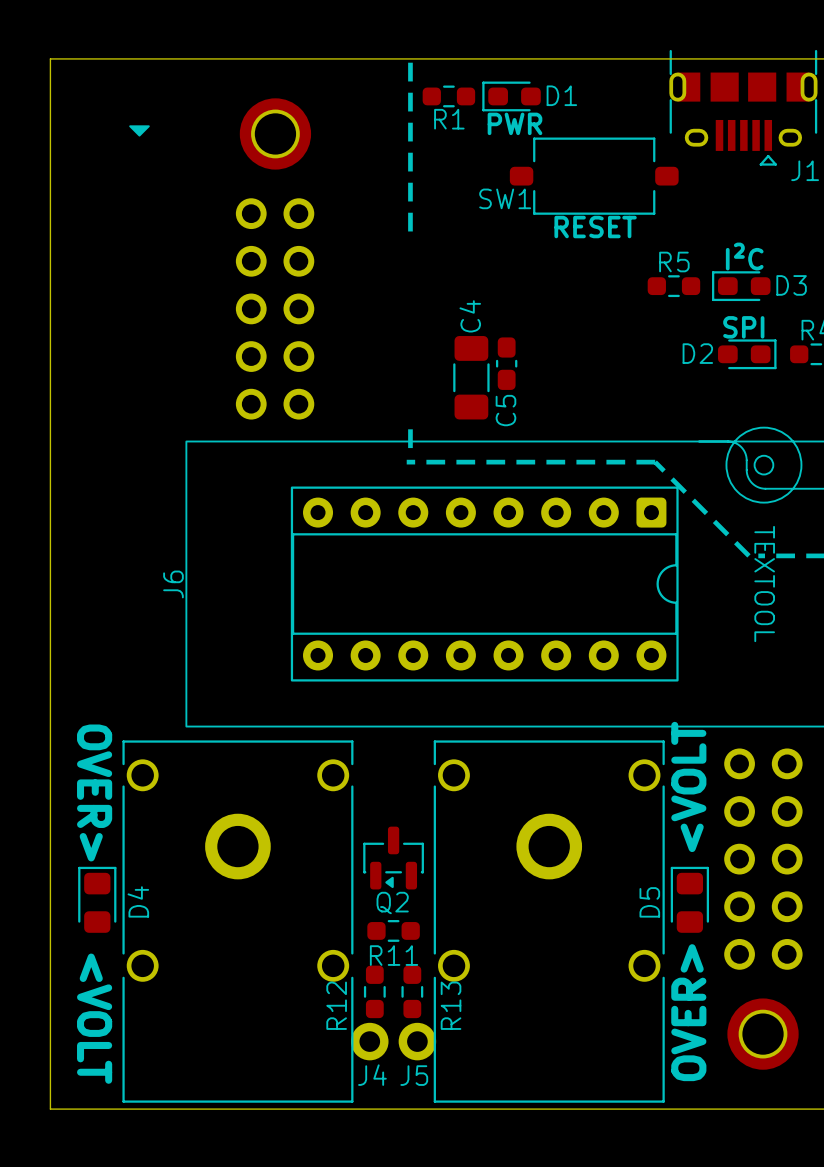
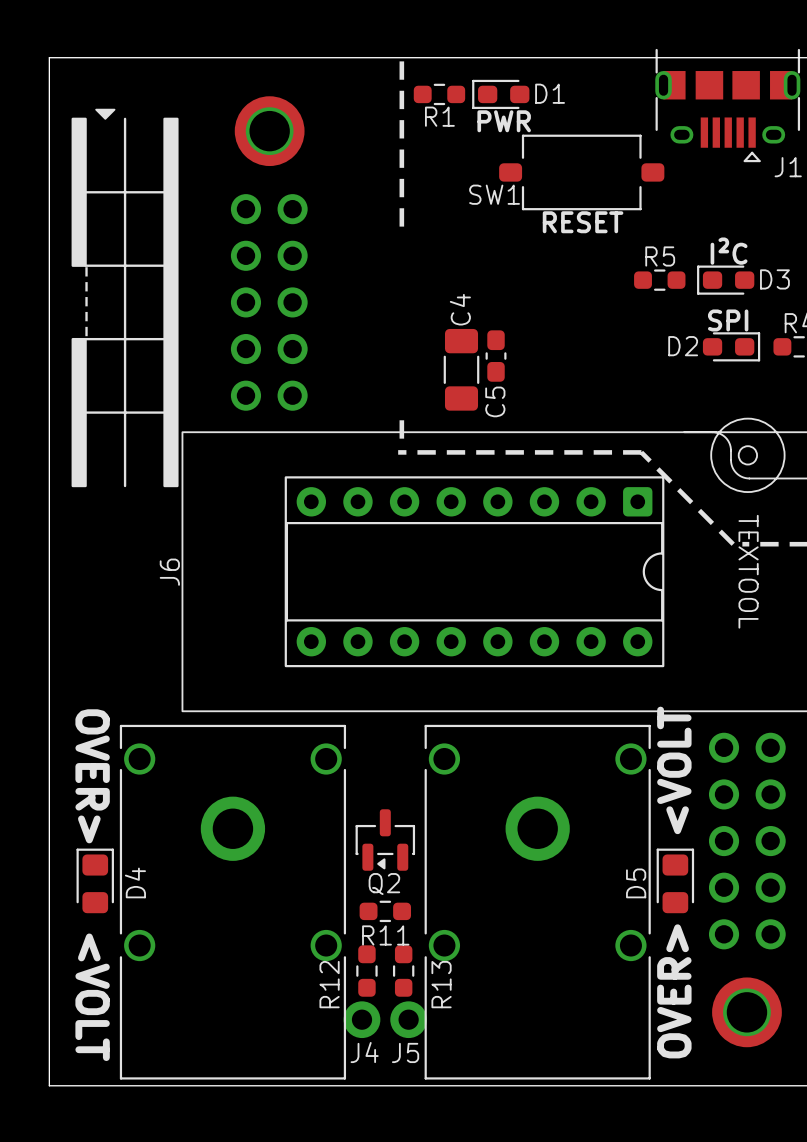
drawing: none -> [71, 117, 87, 267]
drawing: none -> [163, 117, 179, 488]
line: none -> (125, 118) (125, 486)
drawing position: (139, 130) -> (105, 114)
line: none -> (85, 192) (164, 192)
line: none -> (85, 265) (164, 265)
line: none -> (86, 267) (86, 340)
drawing: none -> [71, 337, 87, 488]
line: none -> (85, 339) (164, 339)
line: none -> (85, 412) (164, 412)

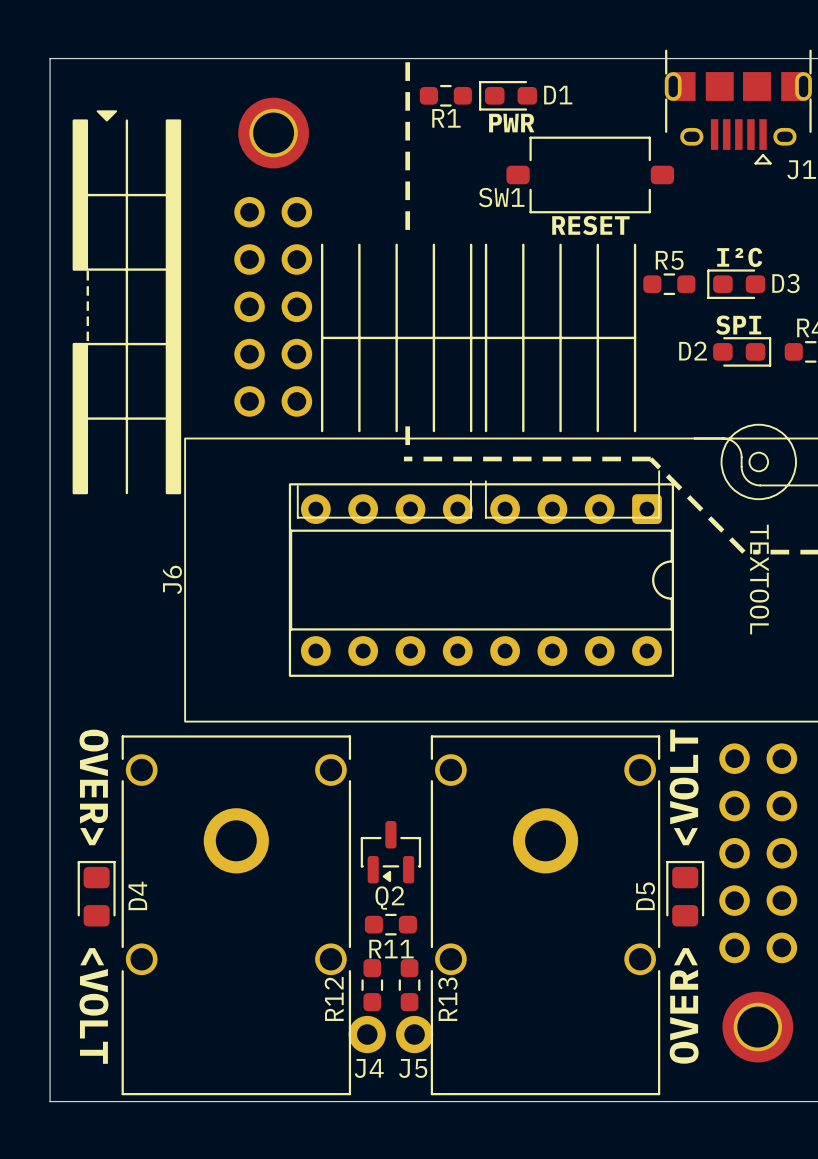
line: none -> (322, 244) (322, 431)
line: none -> (359, 244) (359, 431)
line: none -> (396, 244) (396, 431)
line: none -> (433, 244) (433, 431)
line: none -> (471, 244) (471, 431)
line: none -> (486, 244) (486, 431)
line: none -> (523, 244) (523, 431)
line: none -> (560, 244) (560, 431)
line: none -> (597, 244) (597, 431)
line: none -> (635, 244) (635, 431)
line: none -> (322, 337) (635, 337)
C5: (496, 356) -> none
C4: (461, 369) -> none
line: none -> (659, 471) (659, 517) (485, 517) (485, 481)
line: none -> (471, 481) (471, 517) (297, 517) (297, 486)

